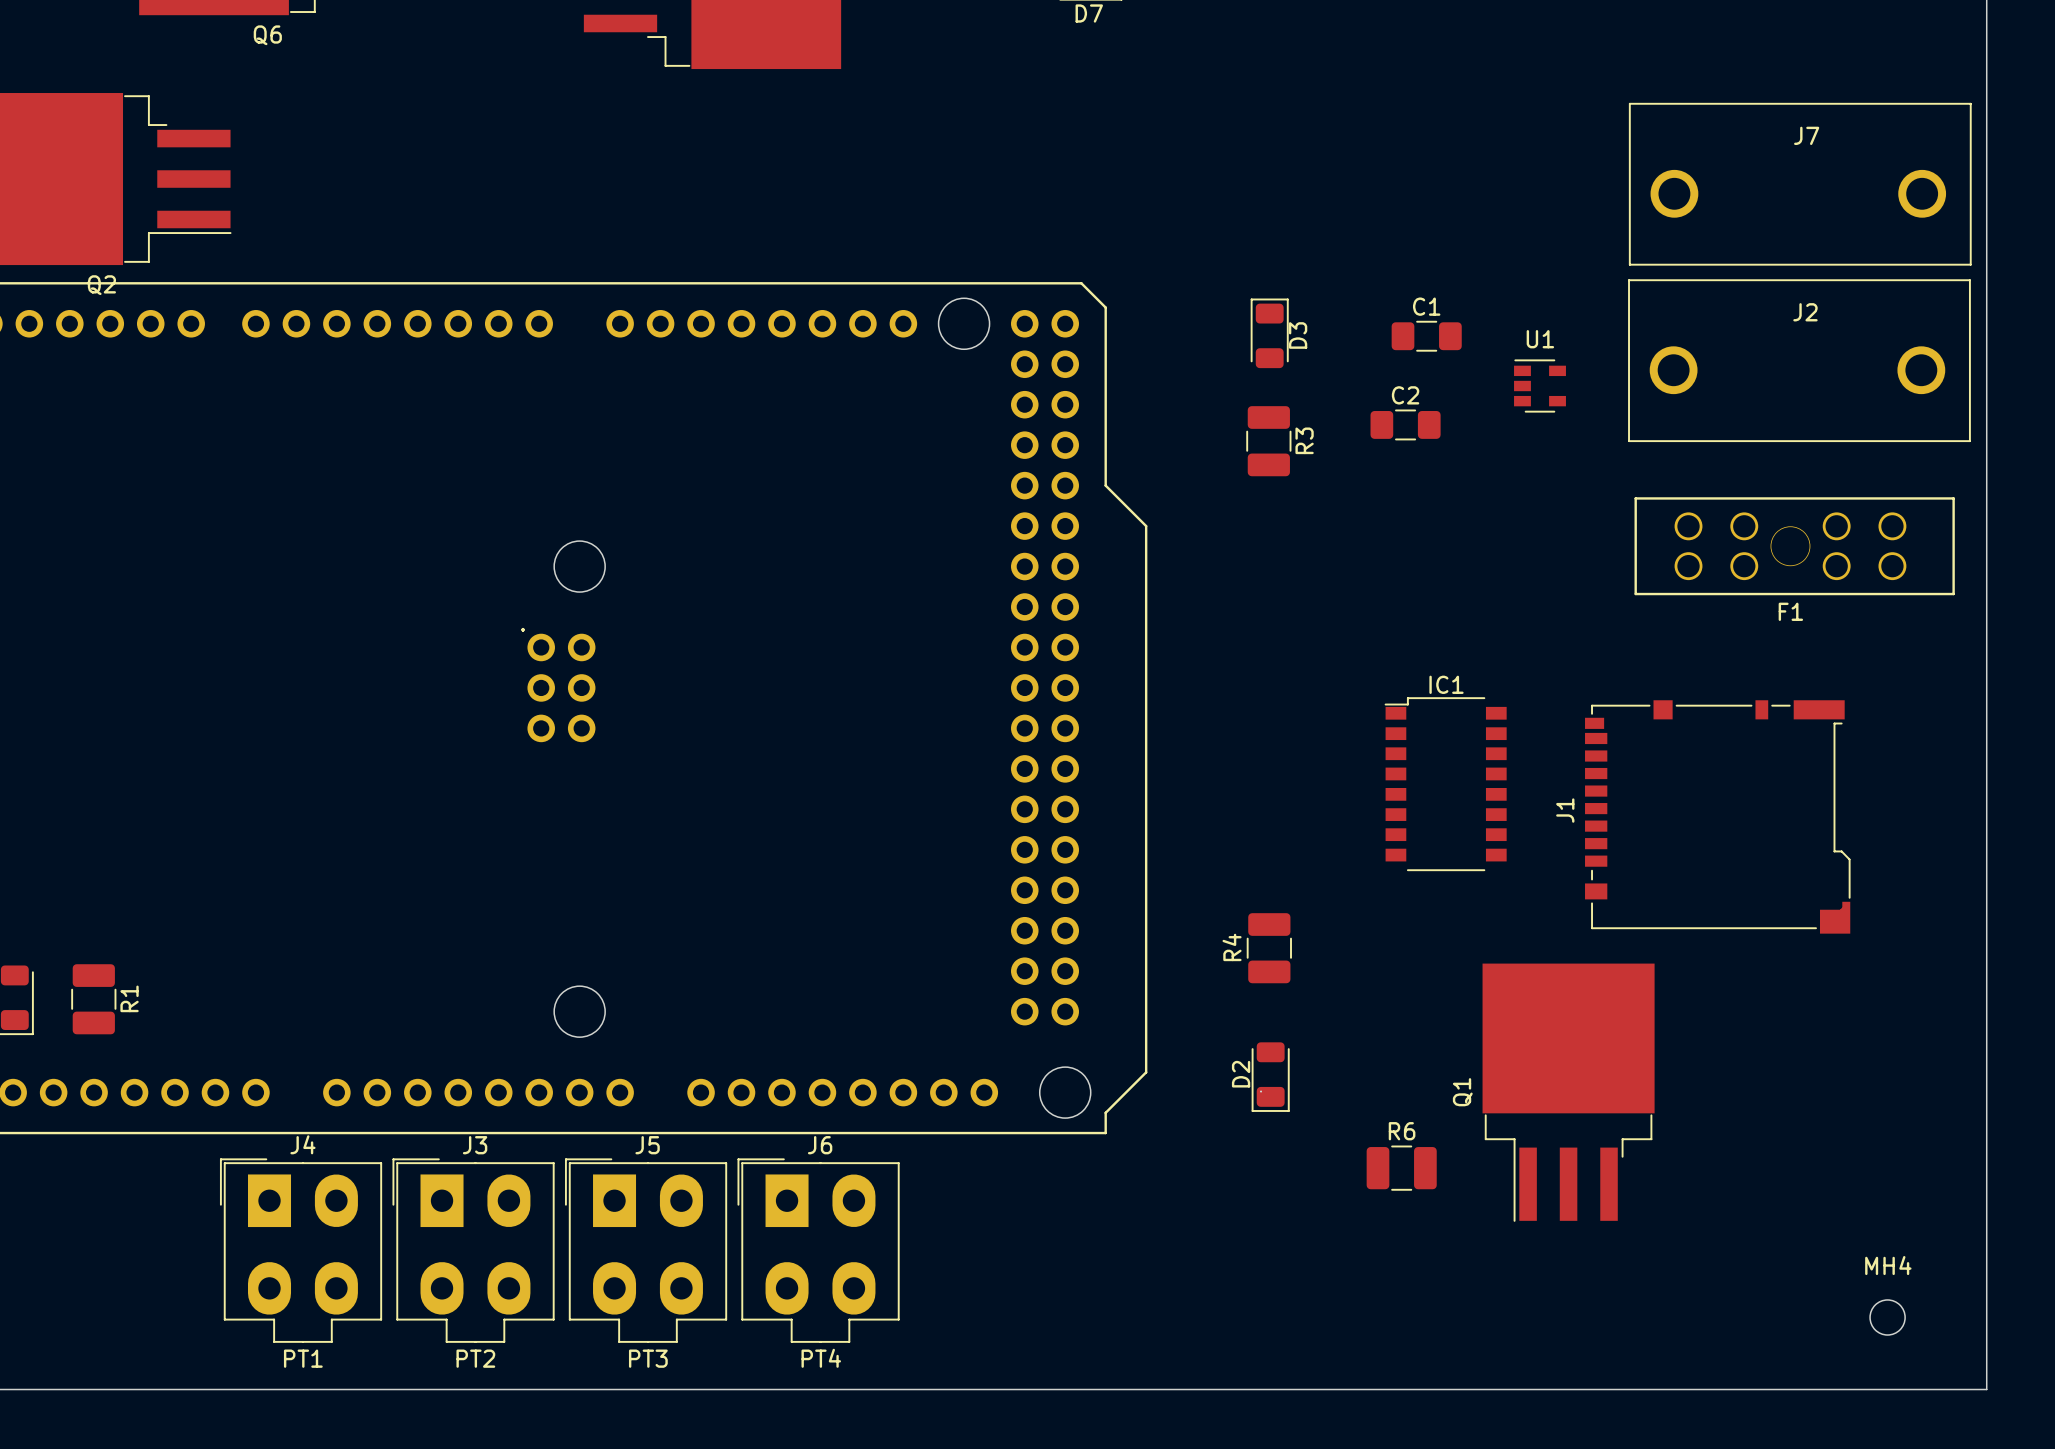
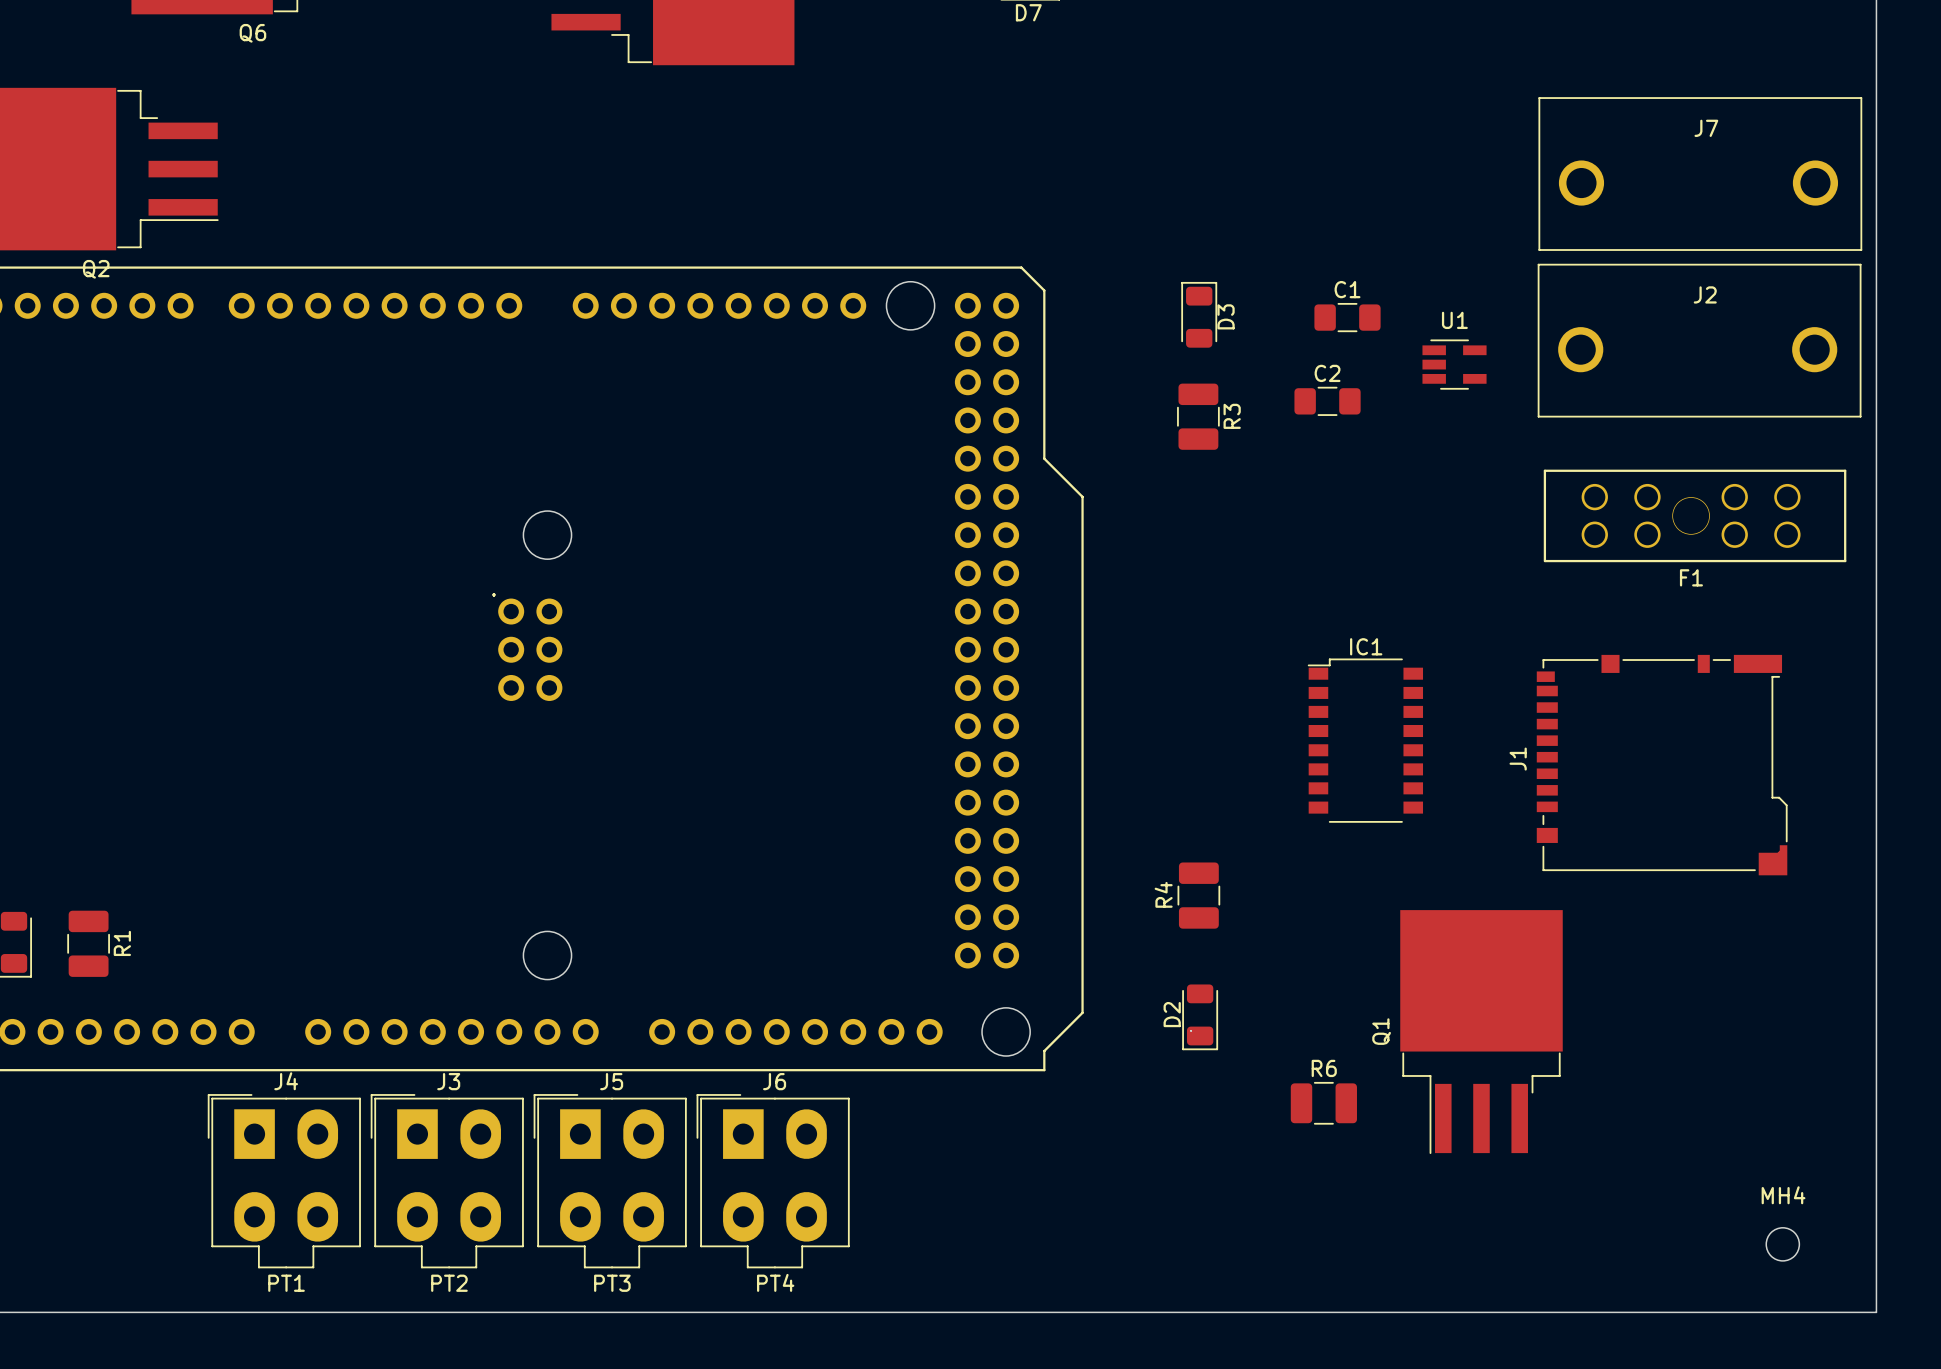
U1 footprint: [1514, 359, 1566, 413] -> [1422, 339, 1487, 390]
J1 position: (1717, 816) -> (1662, 765)

